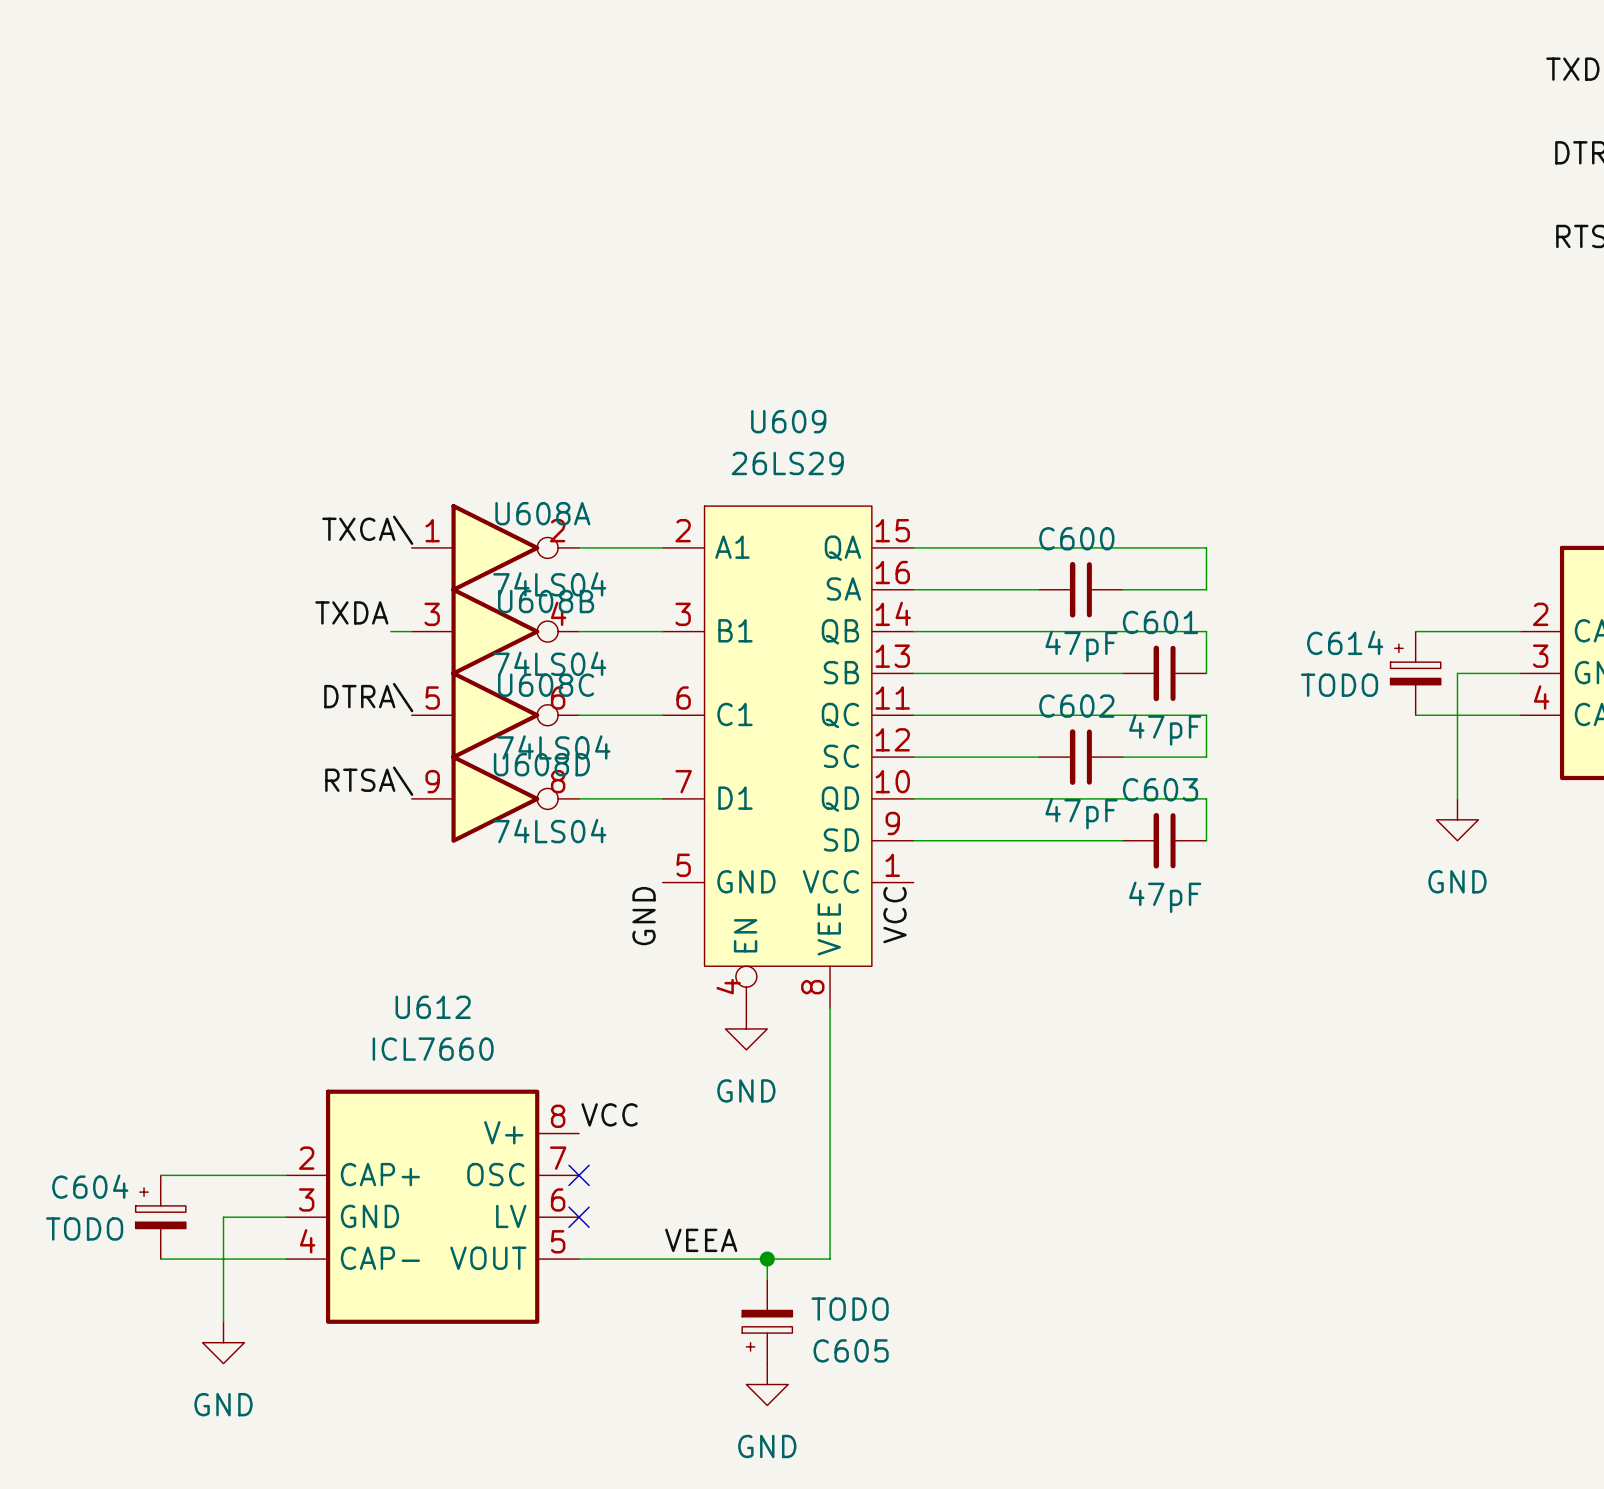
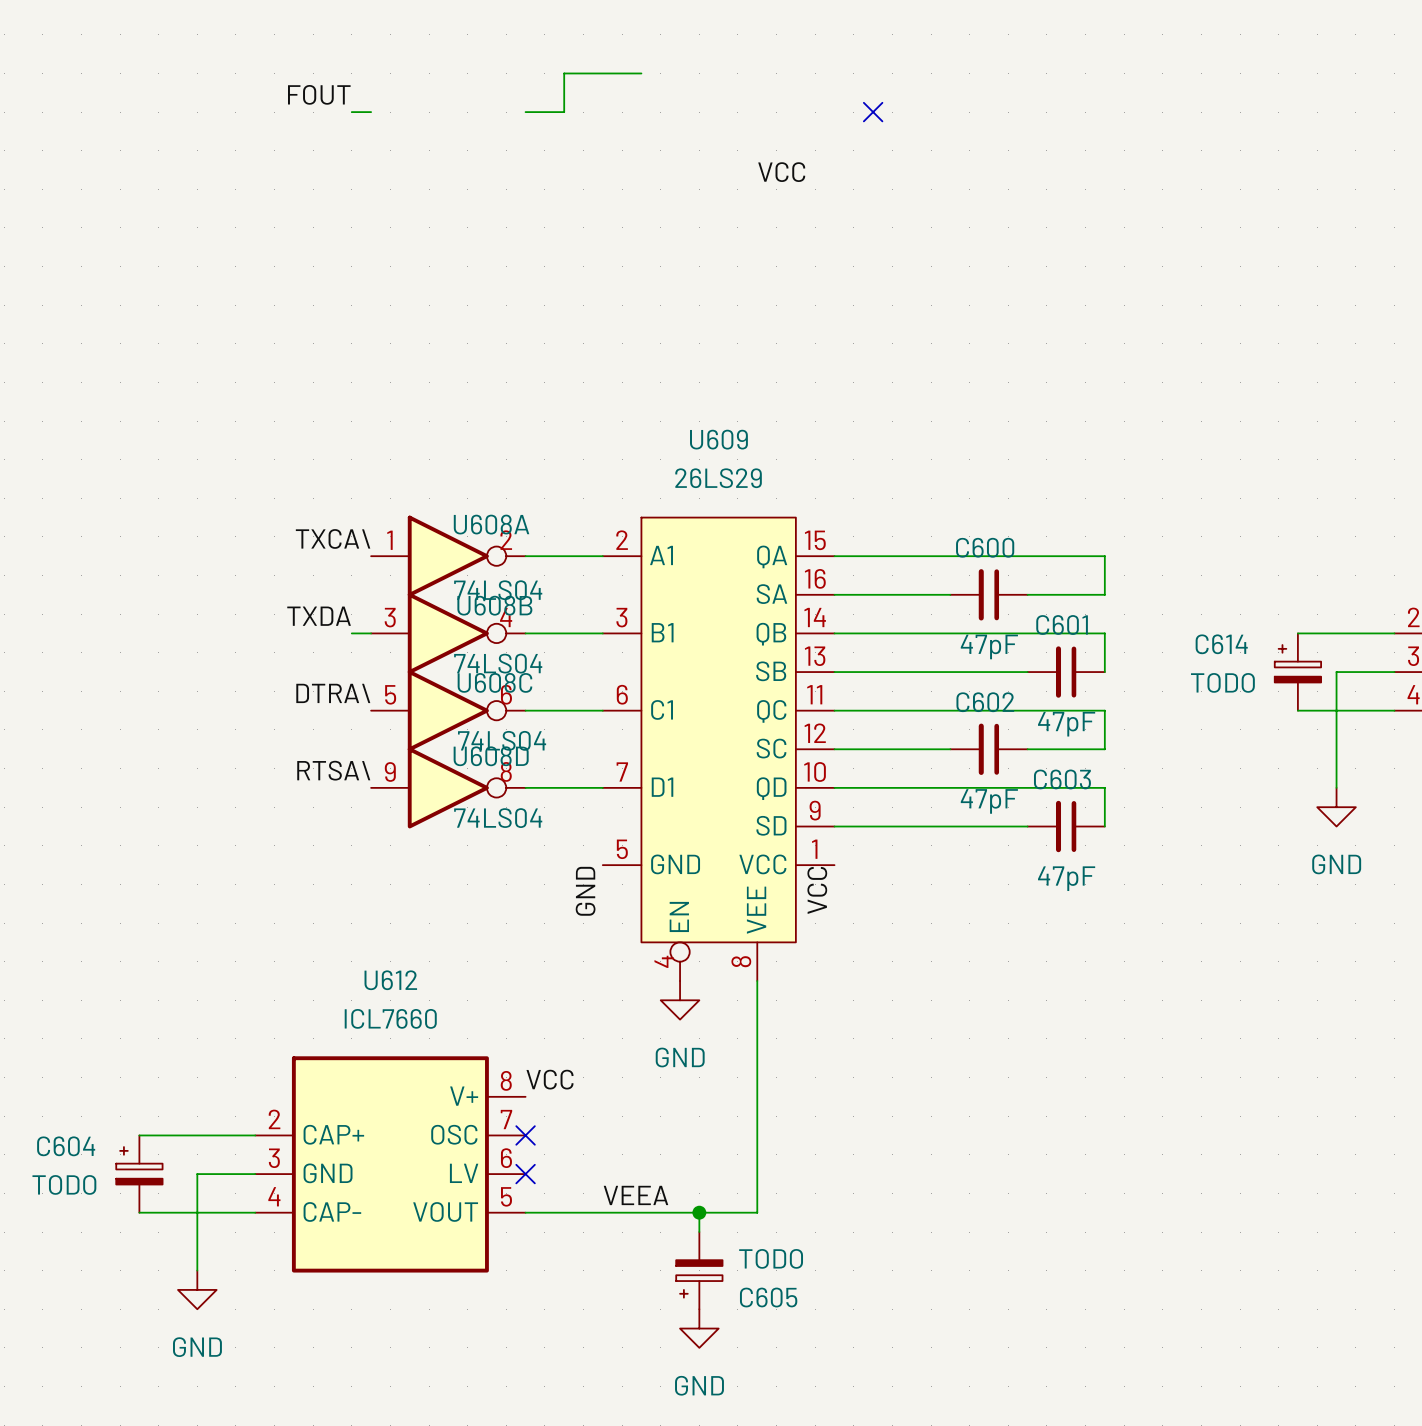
wire: none -> (641, 73) (564, 73) (564, 112) (525, 112)
label: none -> FOUT (319, 94)
wire: none -> (351, 112) (371, 112)
no-connect mark: none -> (873, 112)
label: none -> VCC (781, 172)

